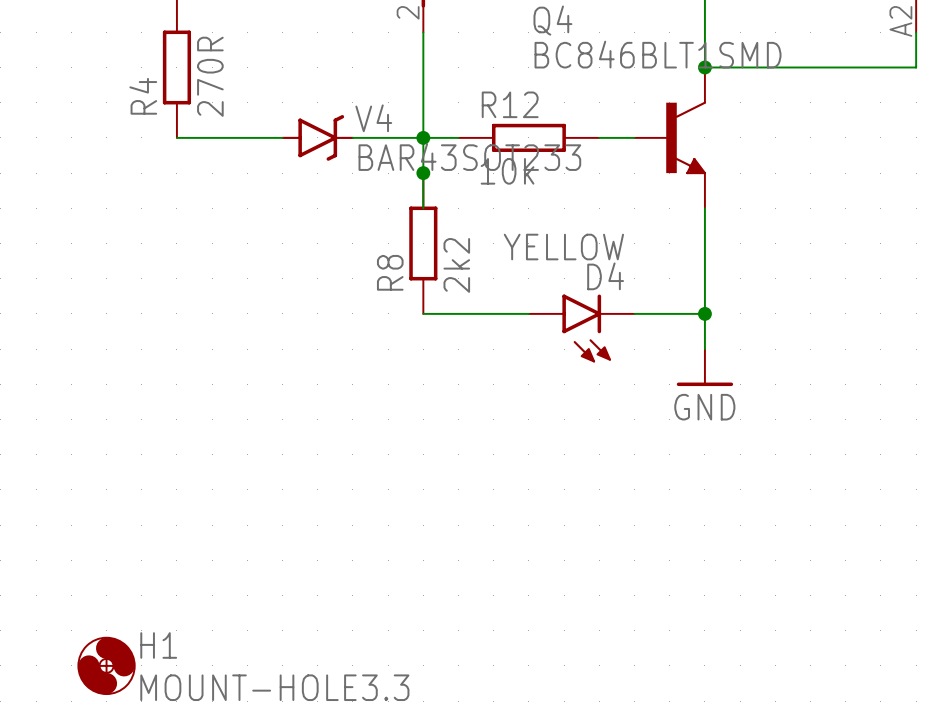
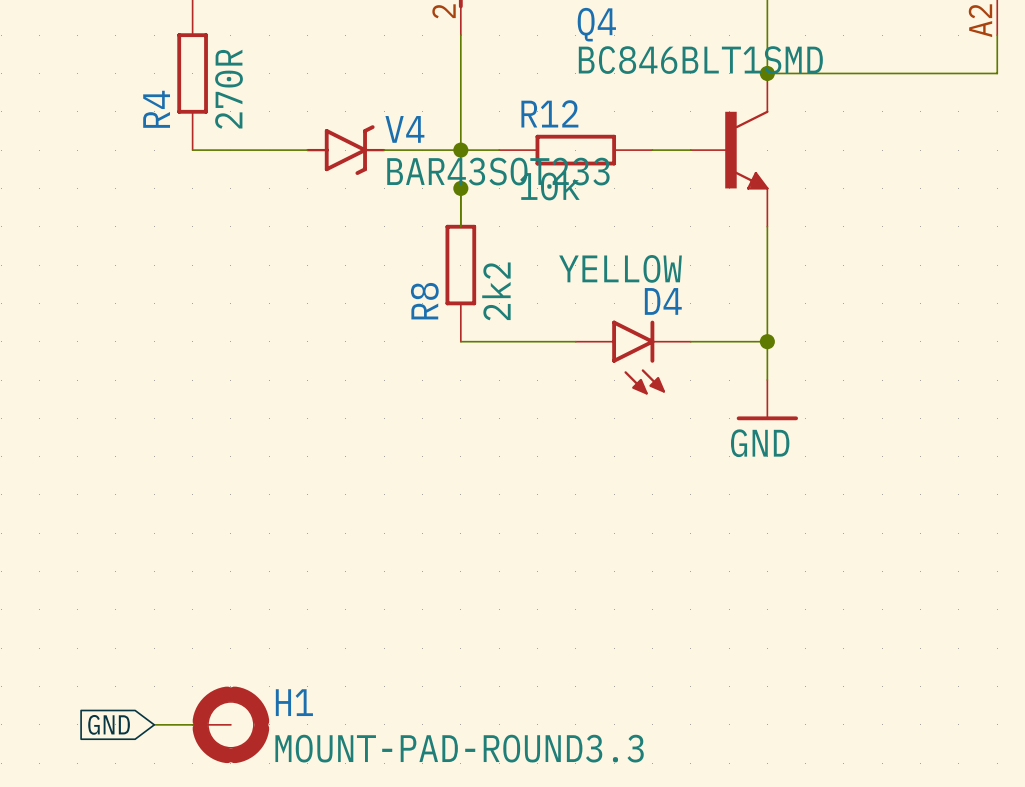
H1 symbol: [78, 637, 136, 695] -> [192, 686, 270, 764]
global label: none -> GND (109, 724)
wire: none -> (154, 724) (192, 724)
H1 value: MOUNT-HOLE3.3 (274, 687) -> MOUNT-PAD-ROUND3.3 (459, 748)

